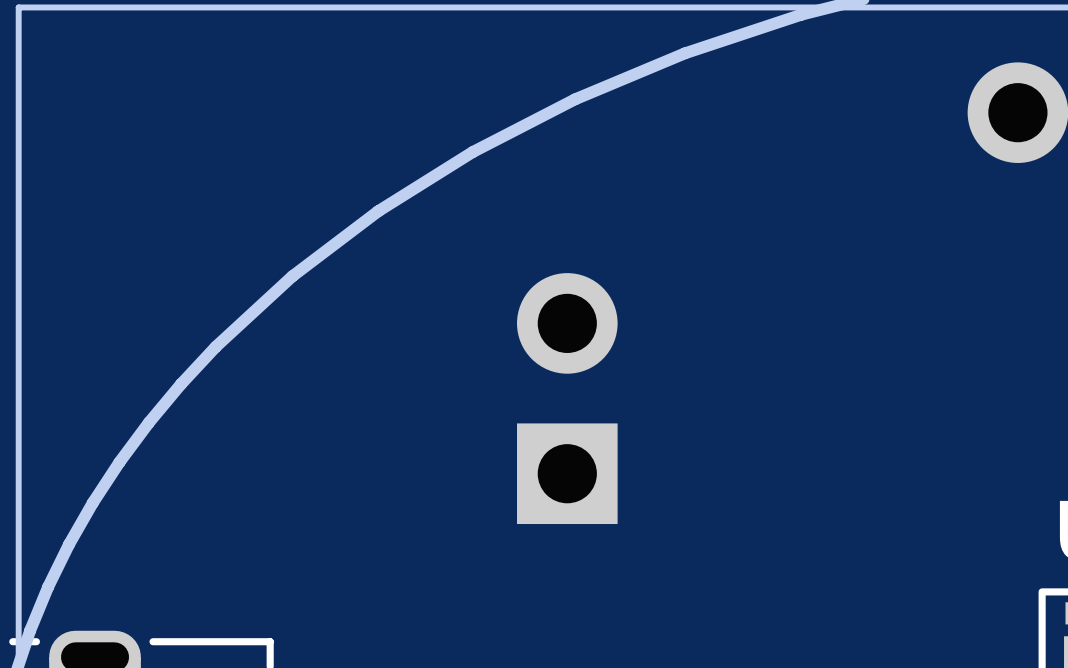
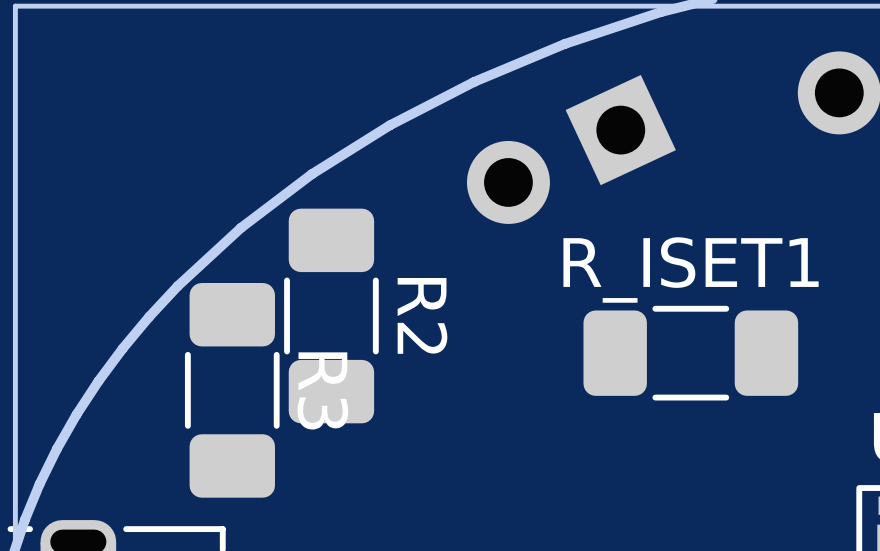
part: none -> (571, 149)
R2: none -> (331, 315)
part: (567, 398) -> none
R_ISET1: none -> (690, 353)
part: none -> (232, 390)

